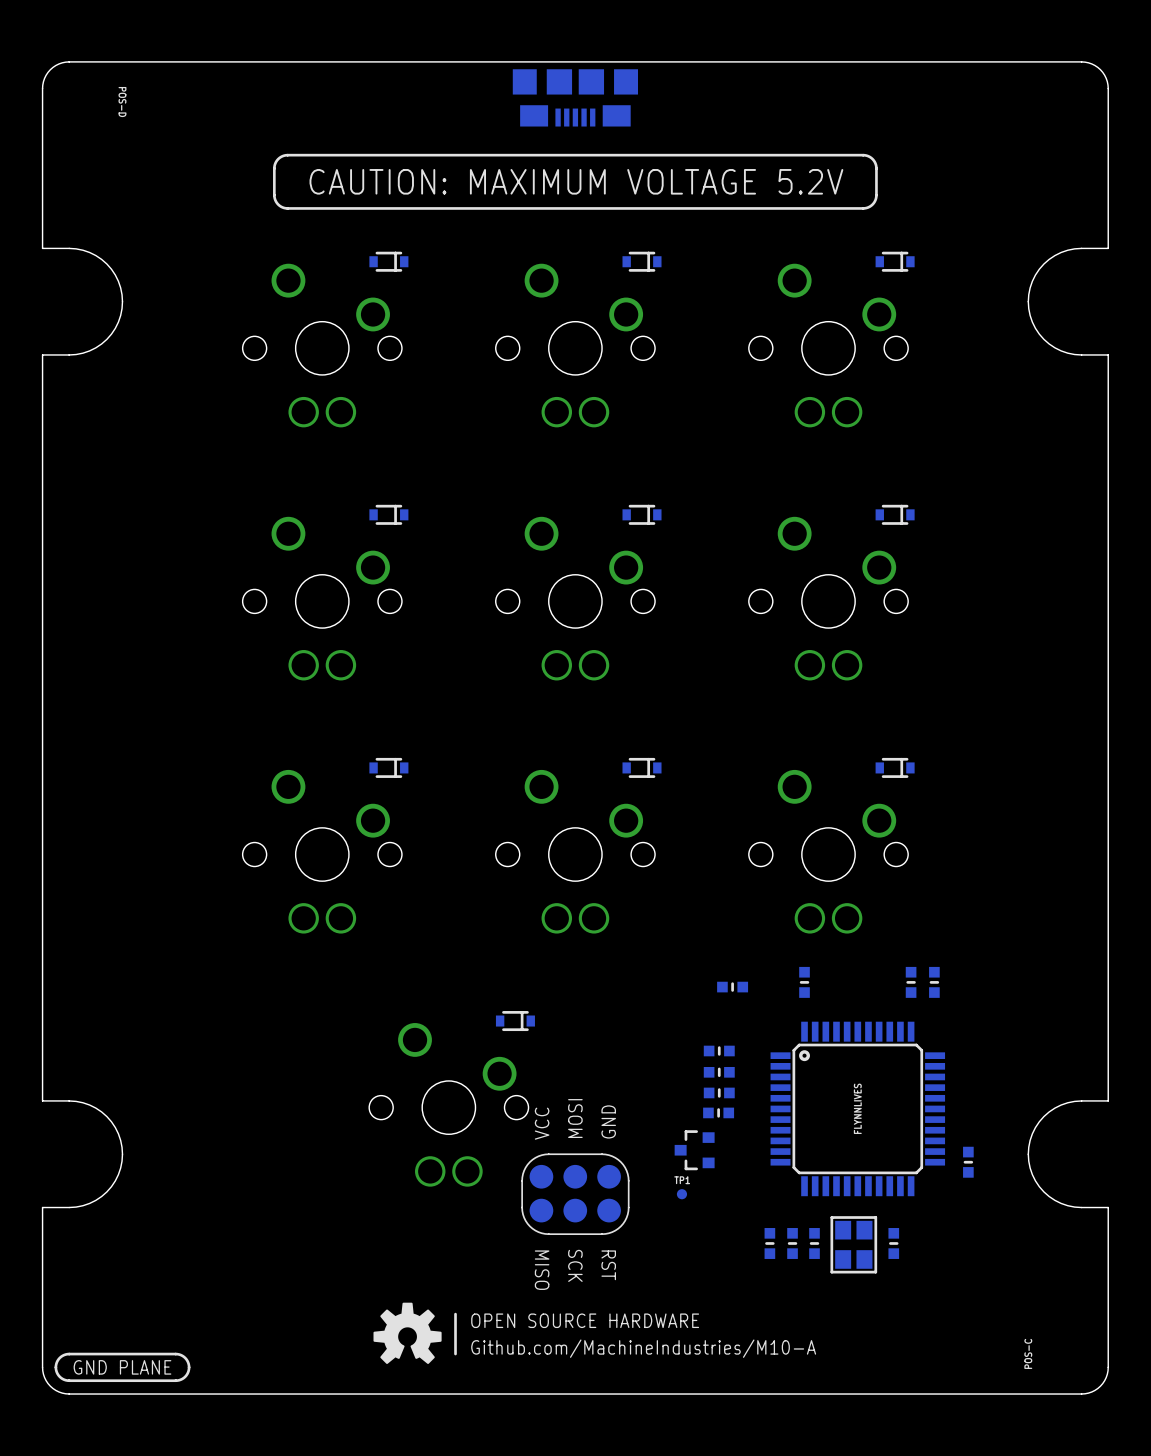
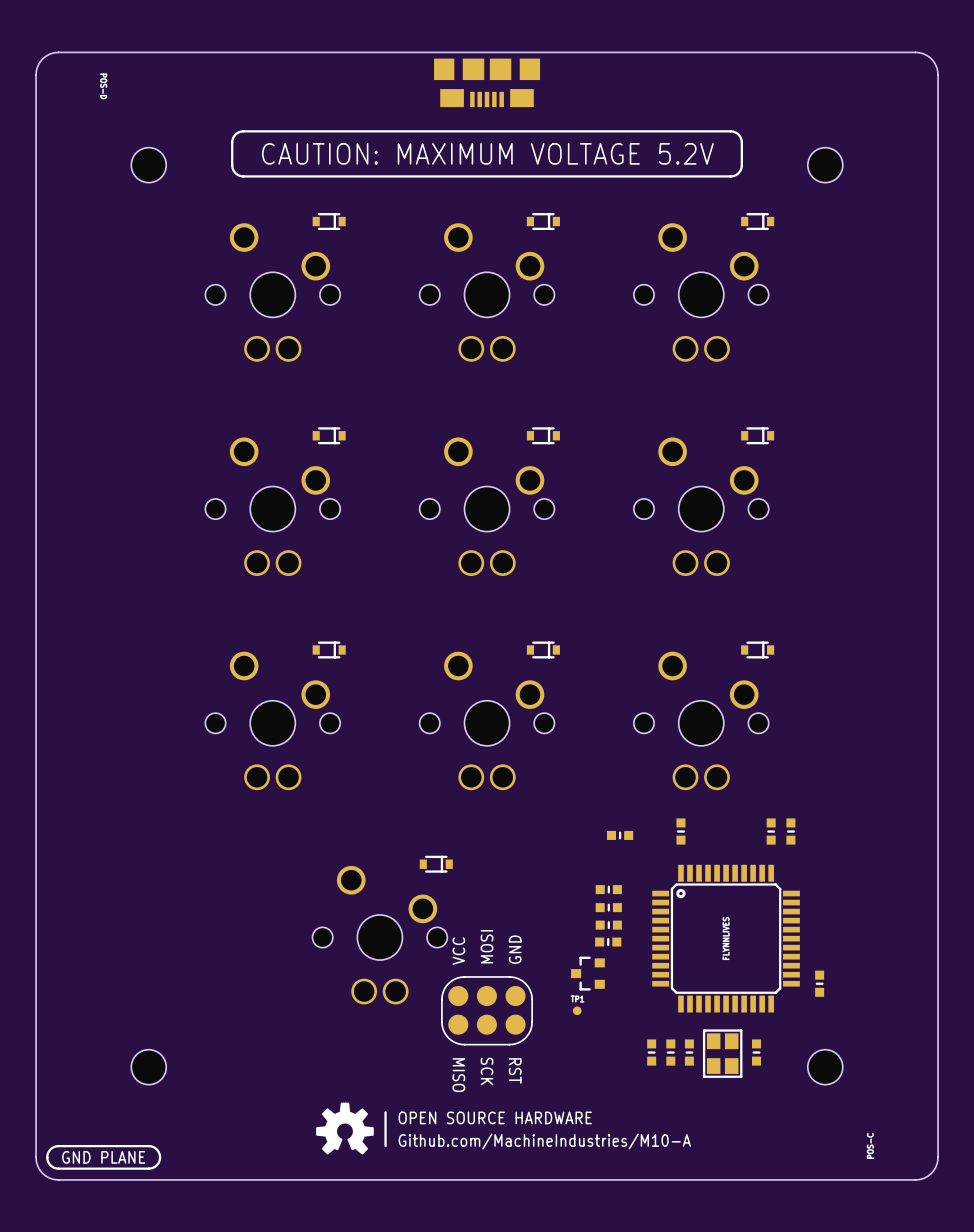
hole: none -> (148, 165)
hole: none -> (825, 165)
board edge: (42, 248) (76, 248) (95, 255) (106, 264) (115, 275) (120, 287) (122, 301) (120, 315) (115, 328) (106, 339) (95, 347) (76, 354) (42, 354) -> (36, 210) (36, 300)
board edge: (1108, 248) (1074, 248) (1054, 255) (1043, 264) (1035, 275) (1030, 287) (1028, 301) (1030, 315) (1035, 328) (1043, 339) (1054, 347) (1074, 354) (1108, 354) -> (938, 210) (938, 300)
board edge: (42, 1100) (76, 1101) (95, 1108) (106, 1116) (115, 1127) (120, 1140) (122, 1154) (120, 1168) (115, 1180) (106, 1191) (95, 1200) (76, 1207) (42, 1207) -> (36, 931) (36, 1022)
board edge: (1108, 1100) (1074, 1101) (1054, 1108) (1043, 1116) (1035, 1127) (1030, 1140) (1028, 1154) (1030, 1168) (1035, 1180) (1043, 1191) (1054, 1200) (1074, 1207) (1108, 1207) -> (938, 931) (938, 1022)
hole: none -> (148, 1067)
hole: none -> (825, 1067)

